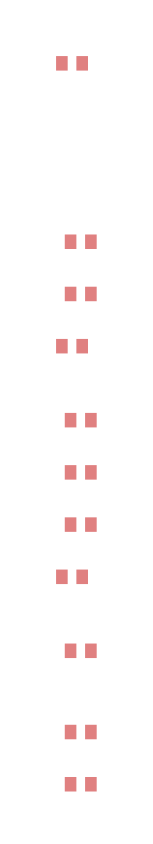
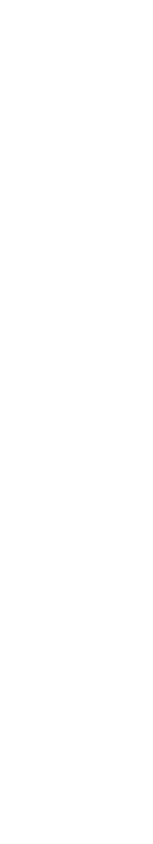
part: (72, 63) -> none
part: (80, 241) -> none
part: (80, 293) -> none
part: (72, 346) -> none
part: (80, 420) -> none
part: (80, 472) -> none
part: (80, 524) -> none
part: (72, 576) -> none
part: (80, 650) -> none
part: (80, 732) -> none
part: (80, 784) -> none

